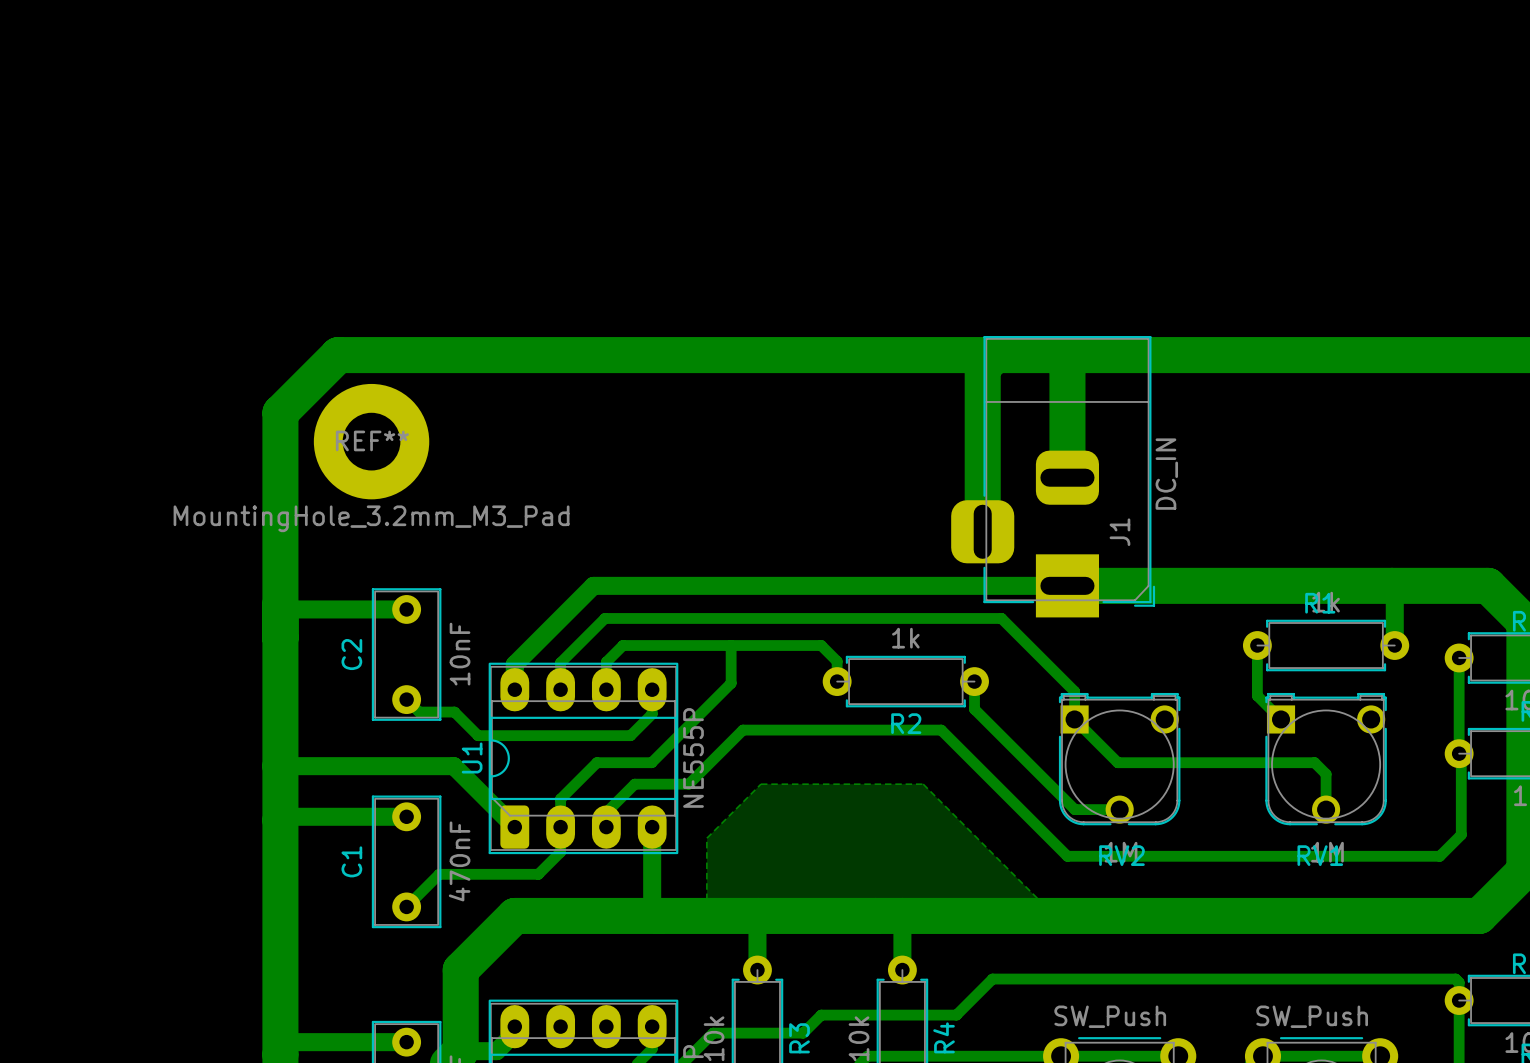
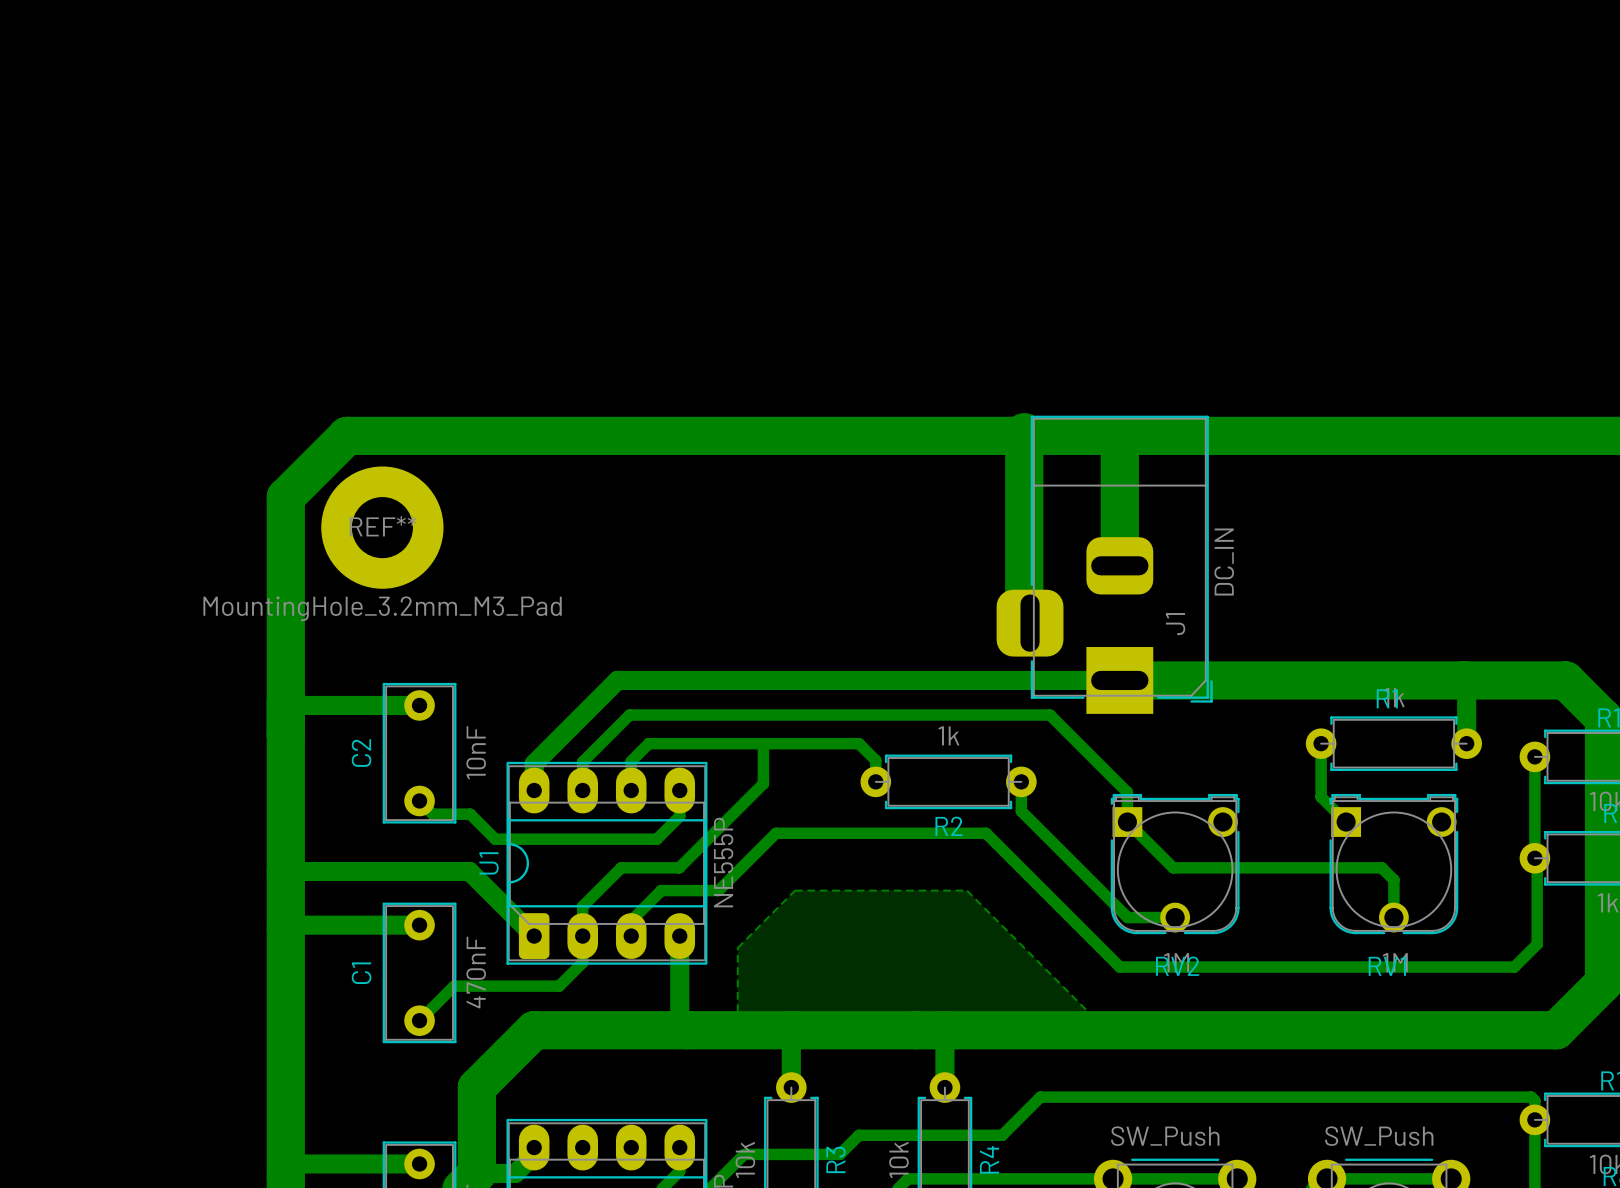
bottom track: none -> (1024, 432) (1024, 617)
bottom track: (995, 355) (982, 367) (982, 531) -> none

